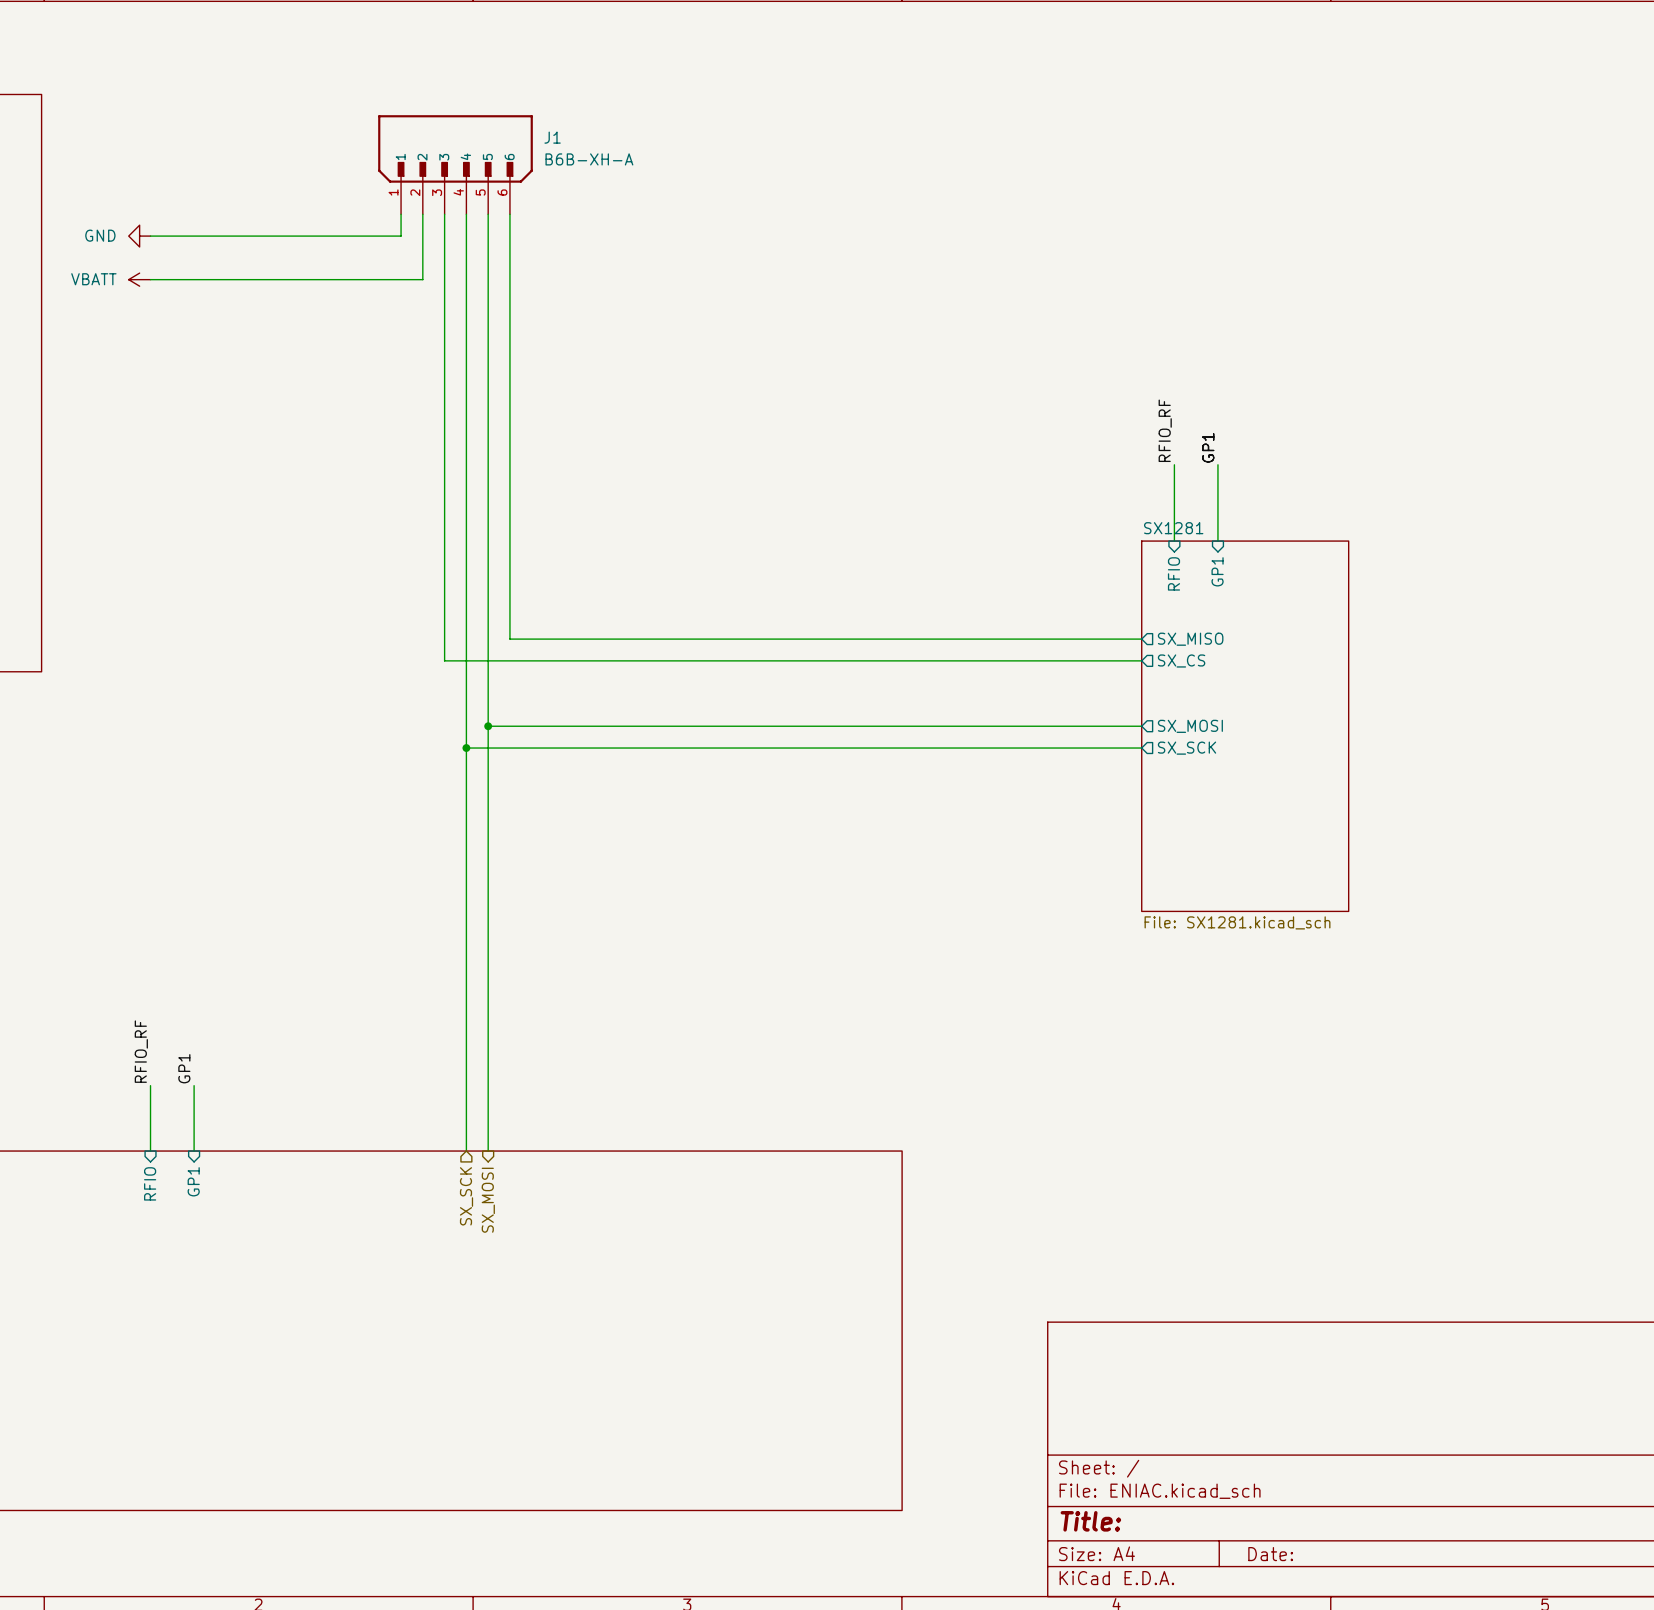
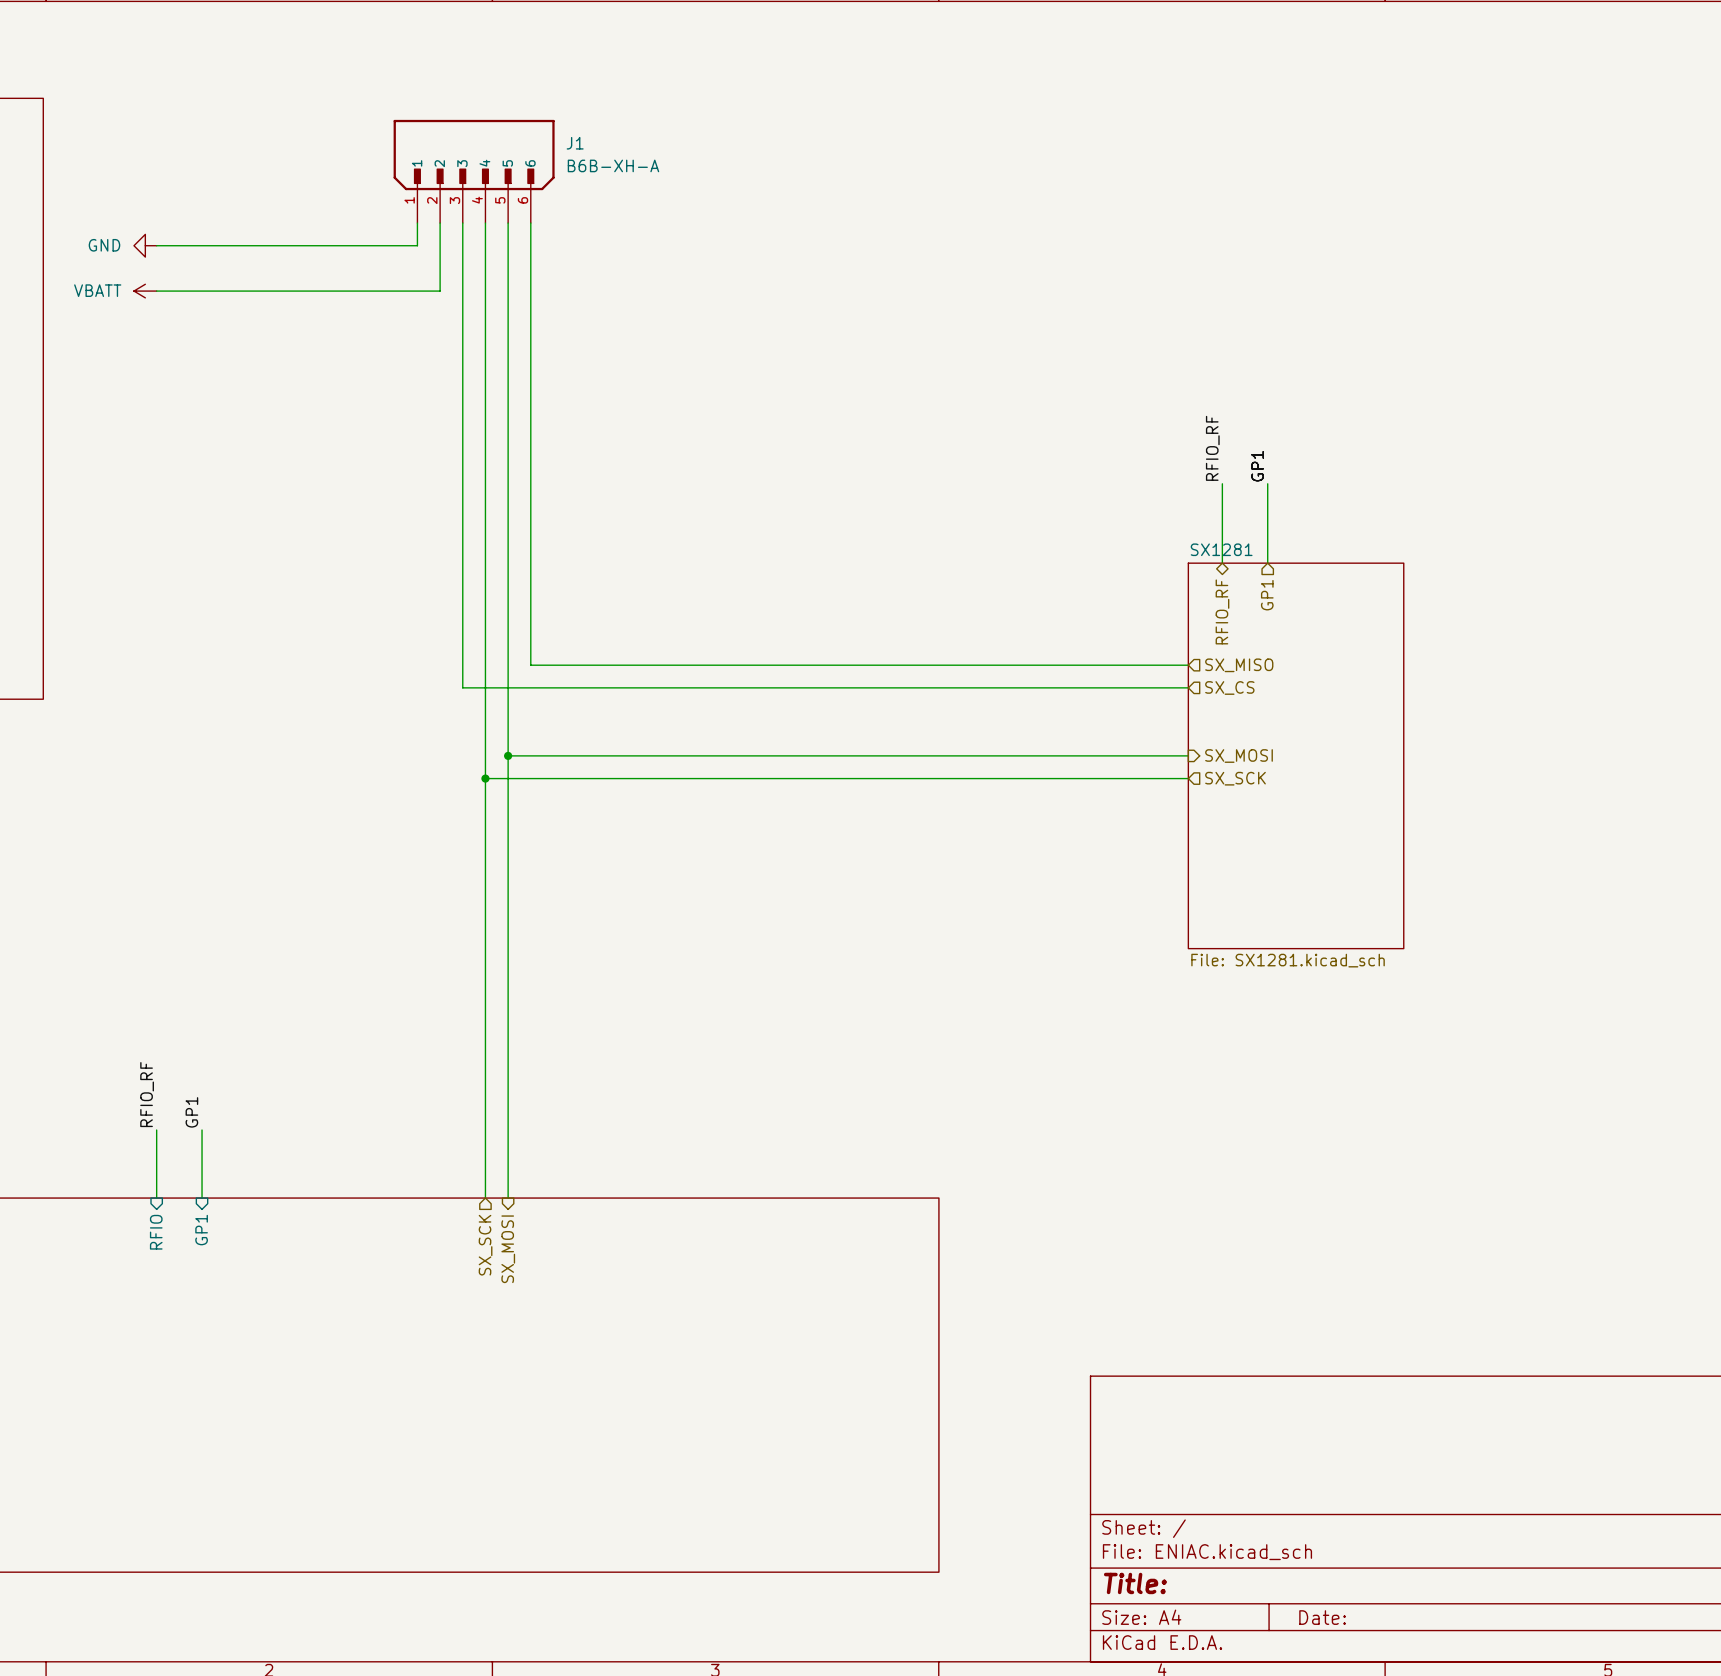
sheet pin: GP1 (1217, 571) -> none
hierarchical label: none -> GP1 (1267, 595)
sheet pin: RFIO (1173, 573) -> none
hierarchical label: none -> RFIO_RF (1222, 611)
sheet pin: SX_MISO (1190, 639) -> none
hierarchical label: none -> SX_MISO (1239, 665)
sheet pin: SX_CS (1181, 660) -> none
hierarchical label: none -> SX_CS (1229, 687)
sheet pin: SX_MOSI (1190, 726) -> none
hierarchical label: none -> SX_MOSI (1239, 756)
sheet pin: SX_SCK (1187, 748) -> none
hierarchical label: none -> SX_SCK (1235, 778)

